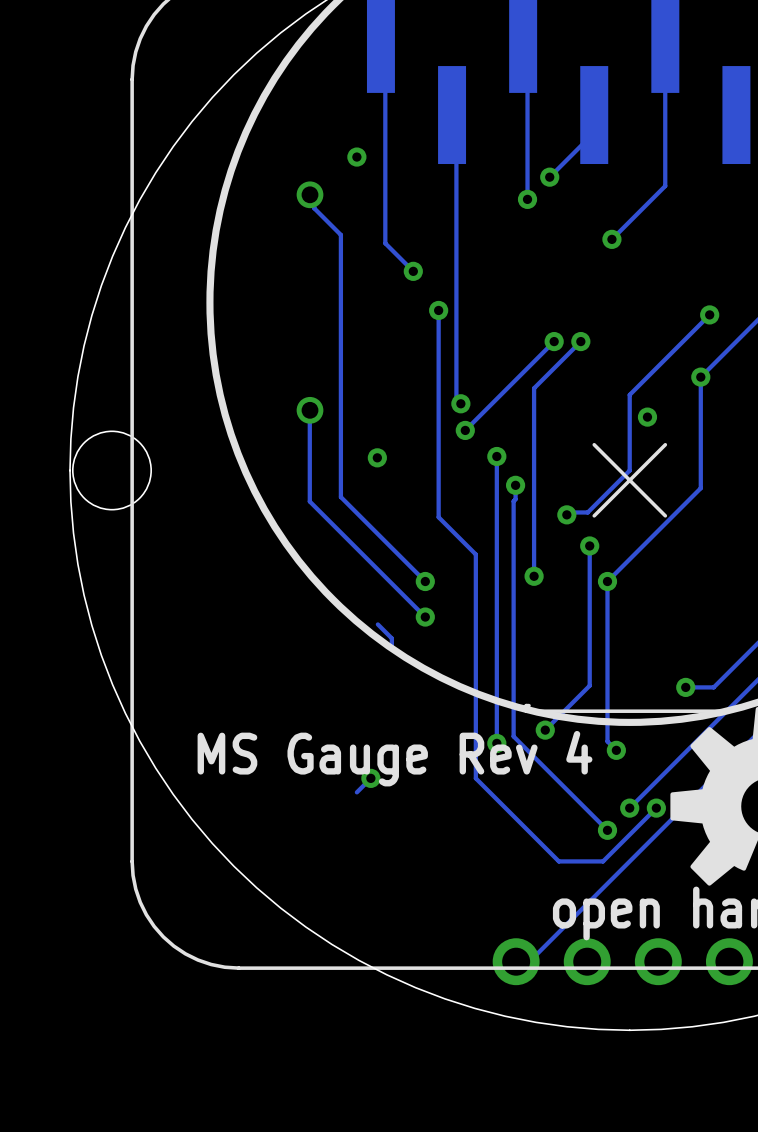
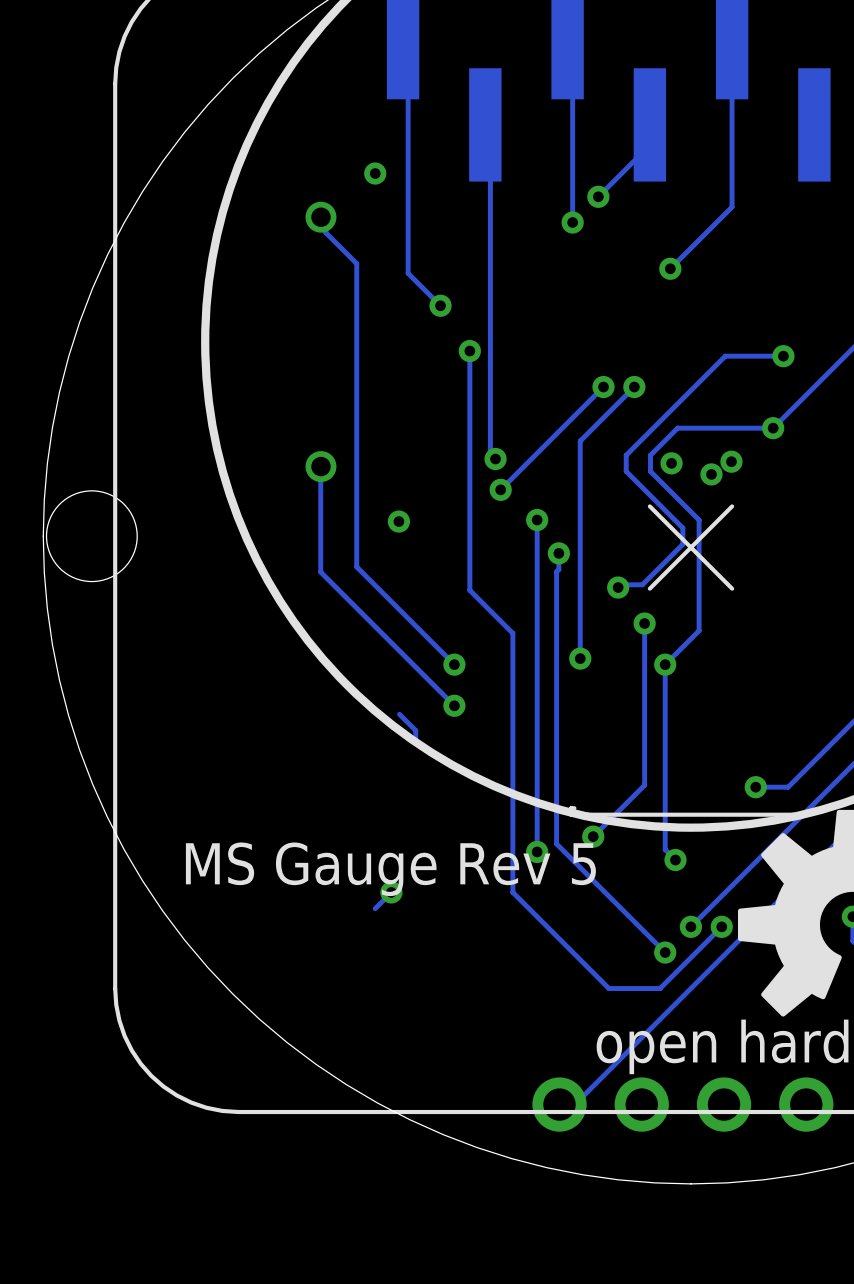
track: (709, 314) (629, 394) (629, 470) (622, 477) -> (783, 356) (725, 356) (626, 455) (626, 471) (682, 528) (682, 544)
track: (700, 377) (700, 488) (636, 552) -> (773, 428) (677, 428) (650, 455) (650, 471) (699, 520) (699, 630)
via: none -> (731, 461)
via: none -> (671, 463)
text: MS Gauge Rev 4 (395, 758) -> MS Gauge Rev 5 (390, 869)

